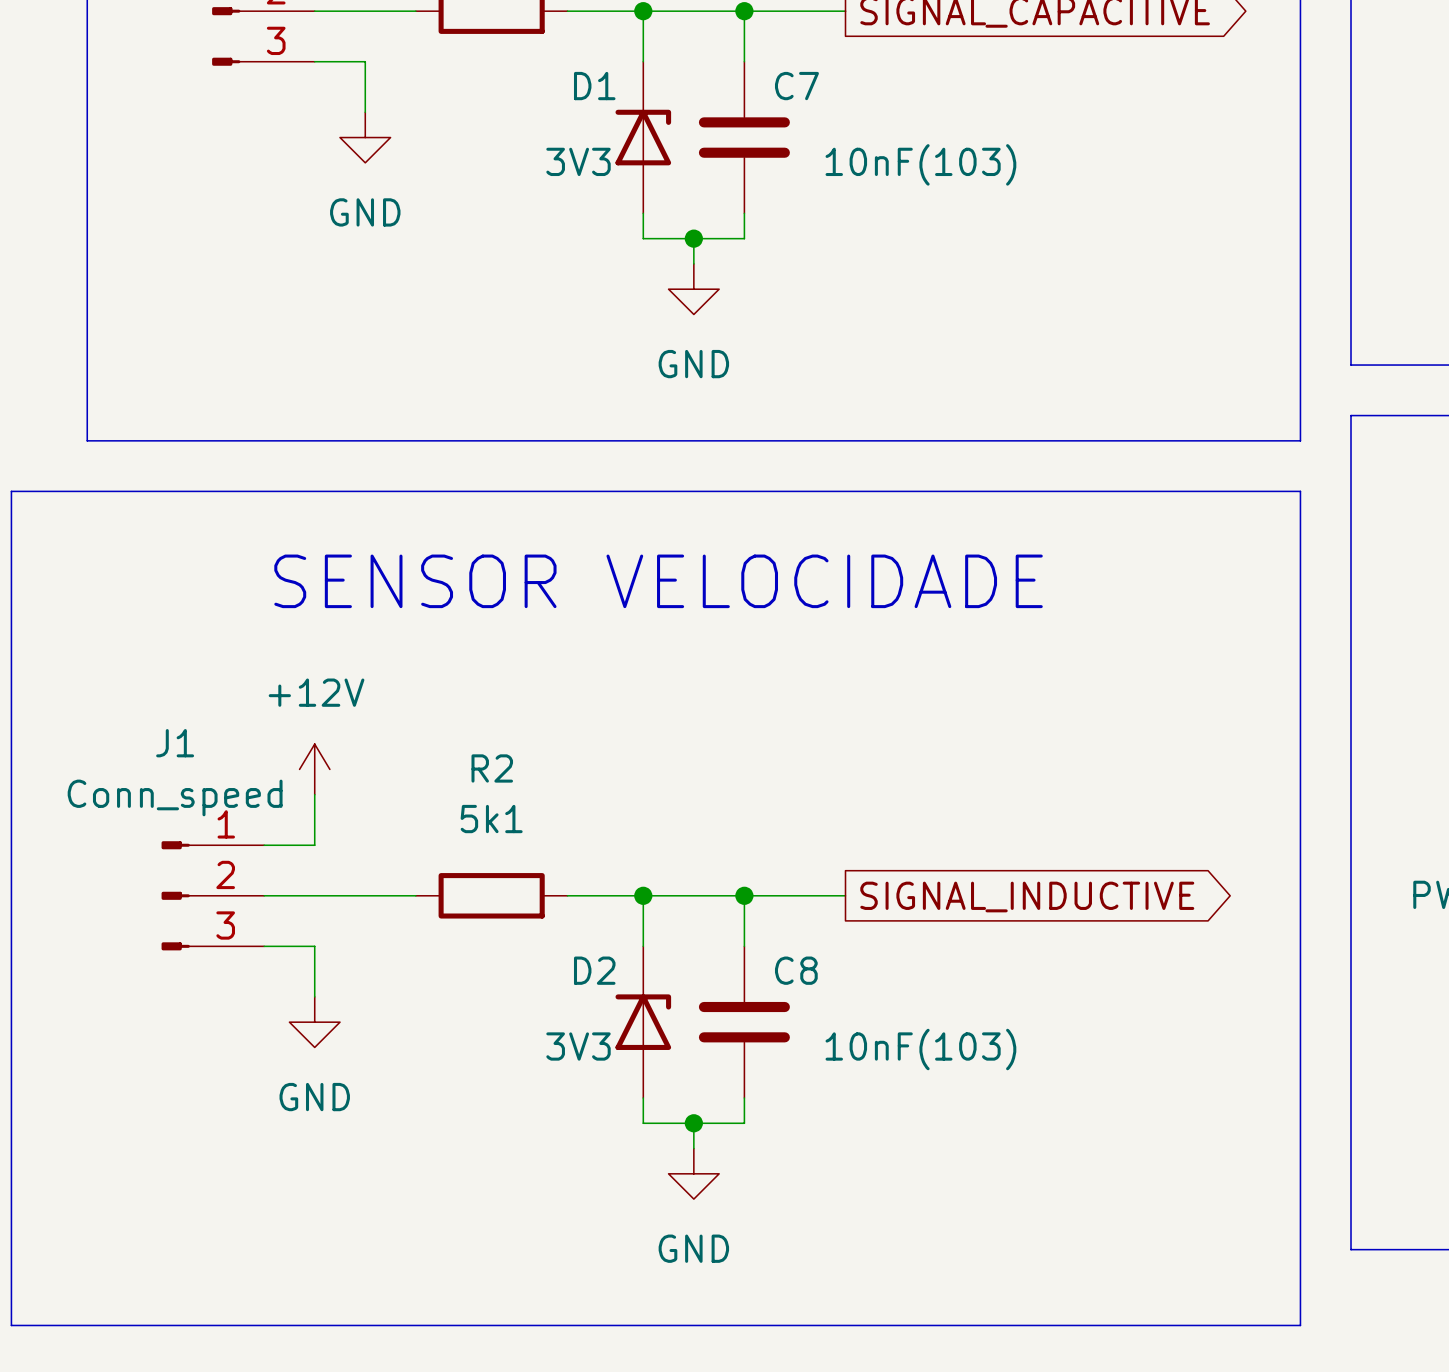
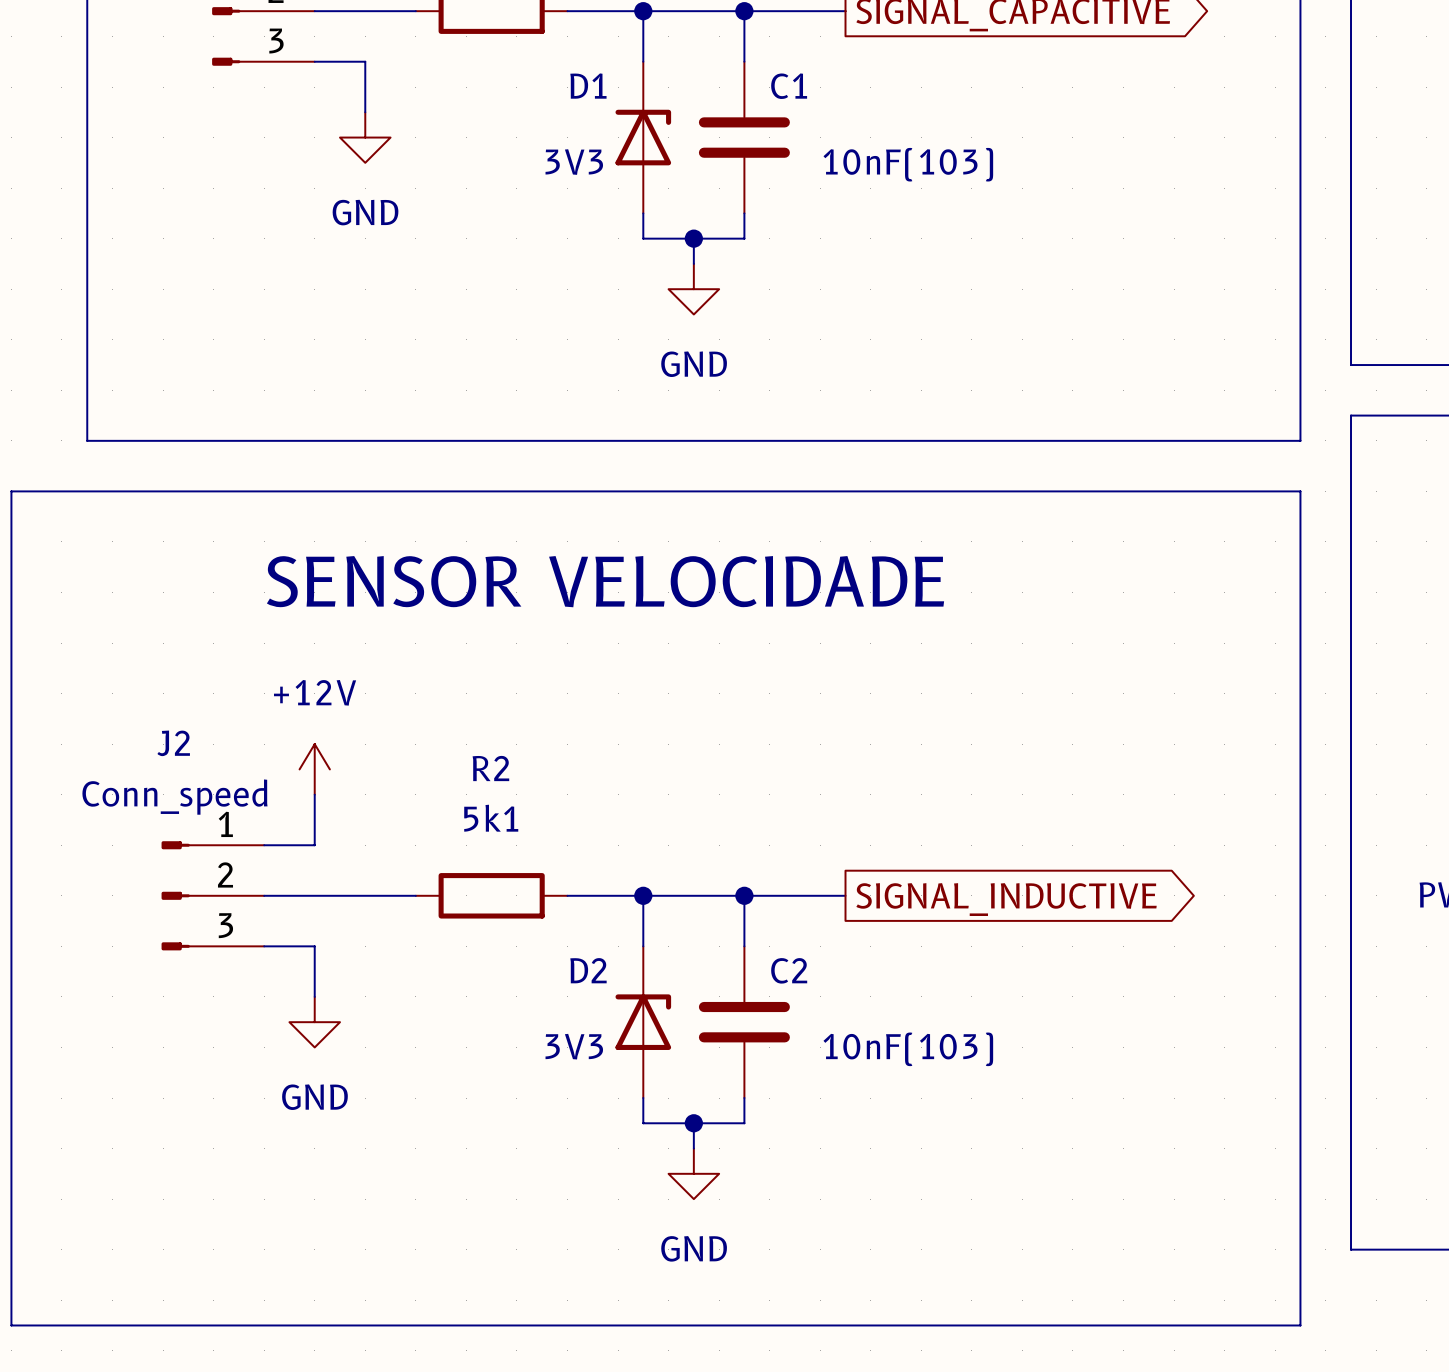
C7 name: C7 (796, 86) -> C1 (789, 86)
J1 name: J1 (175, 743) -> J2 (173, 743)
C8 name: C8 (796, 970) -> C2 (789, 970)

